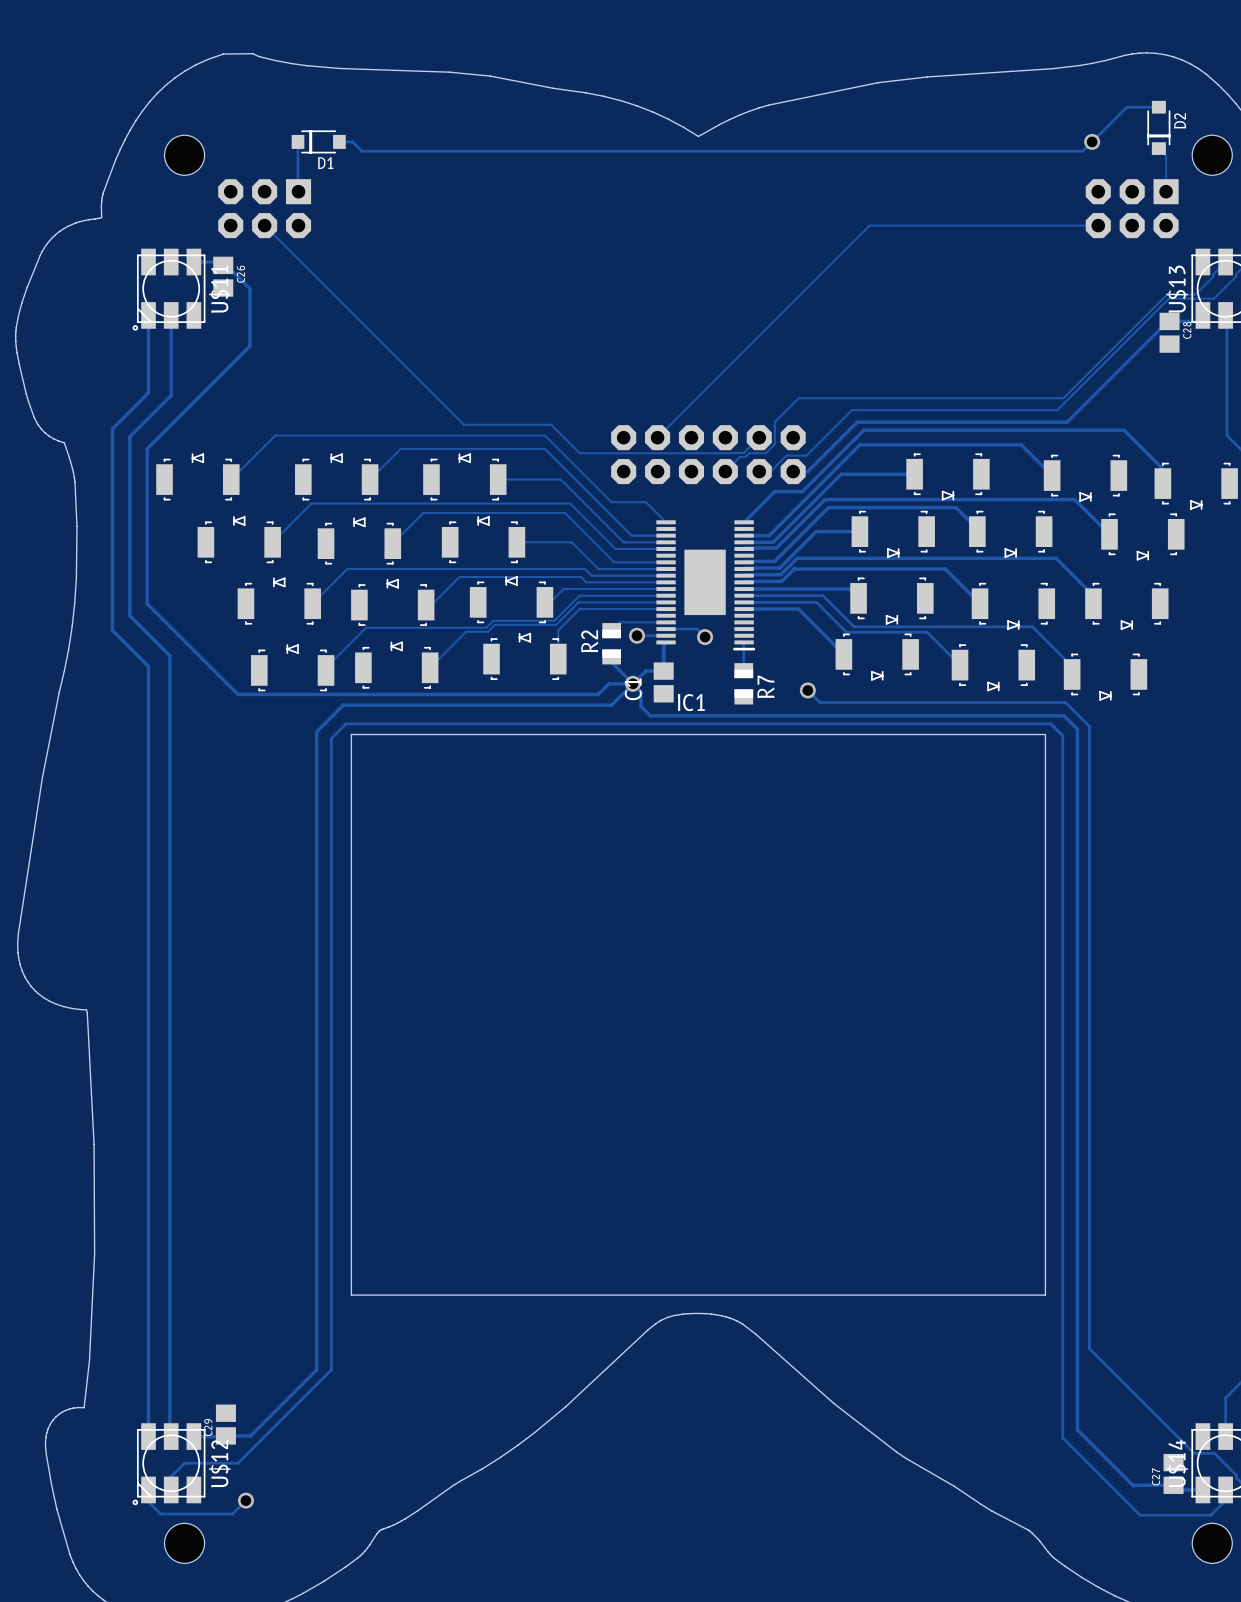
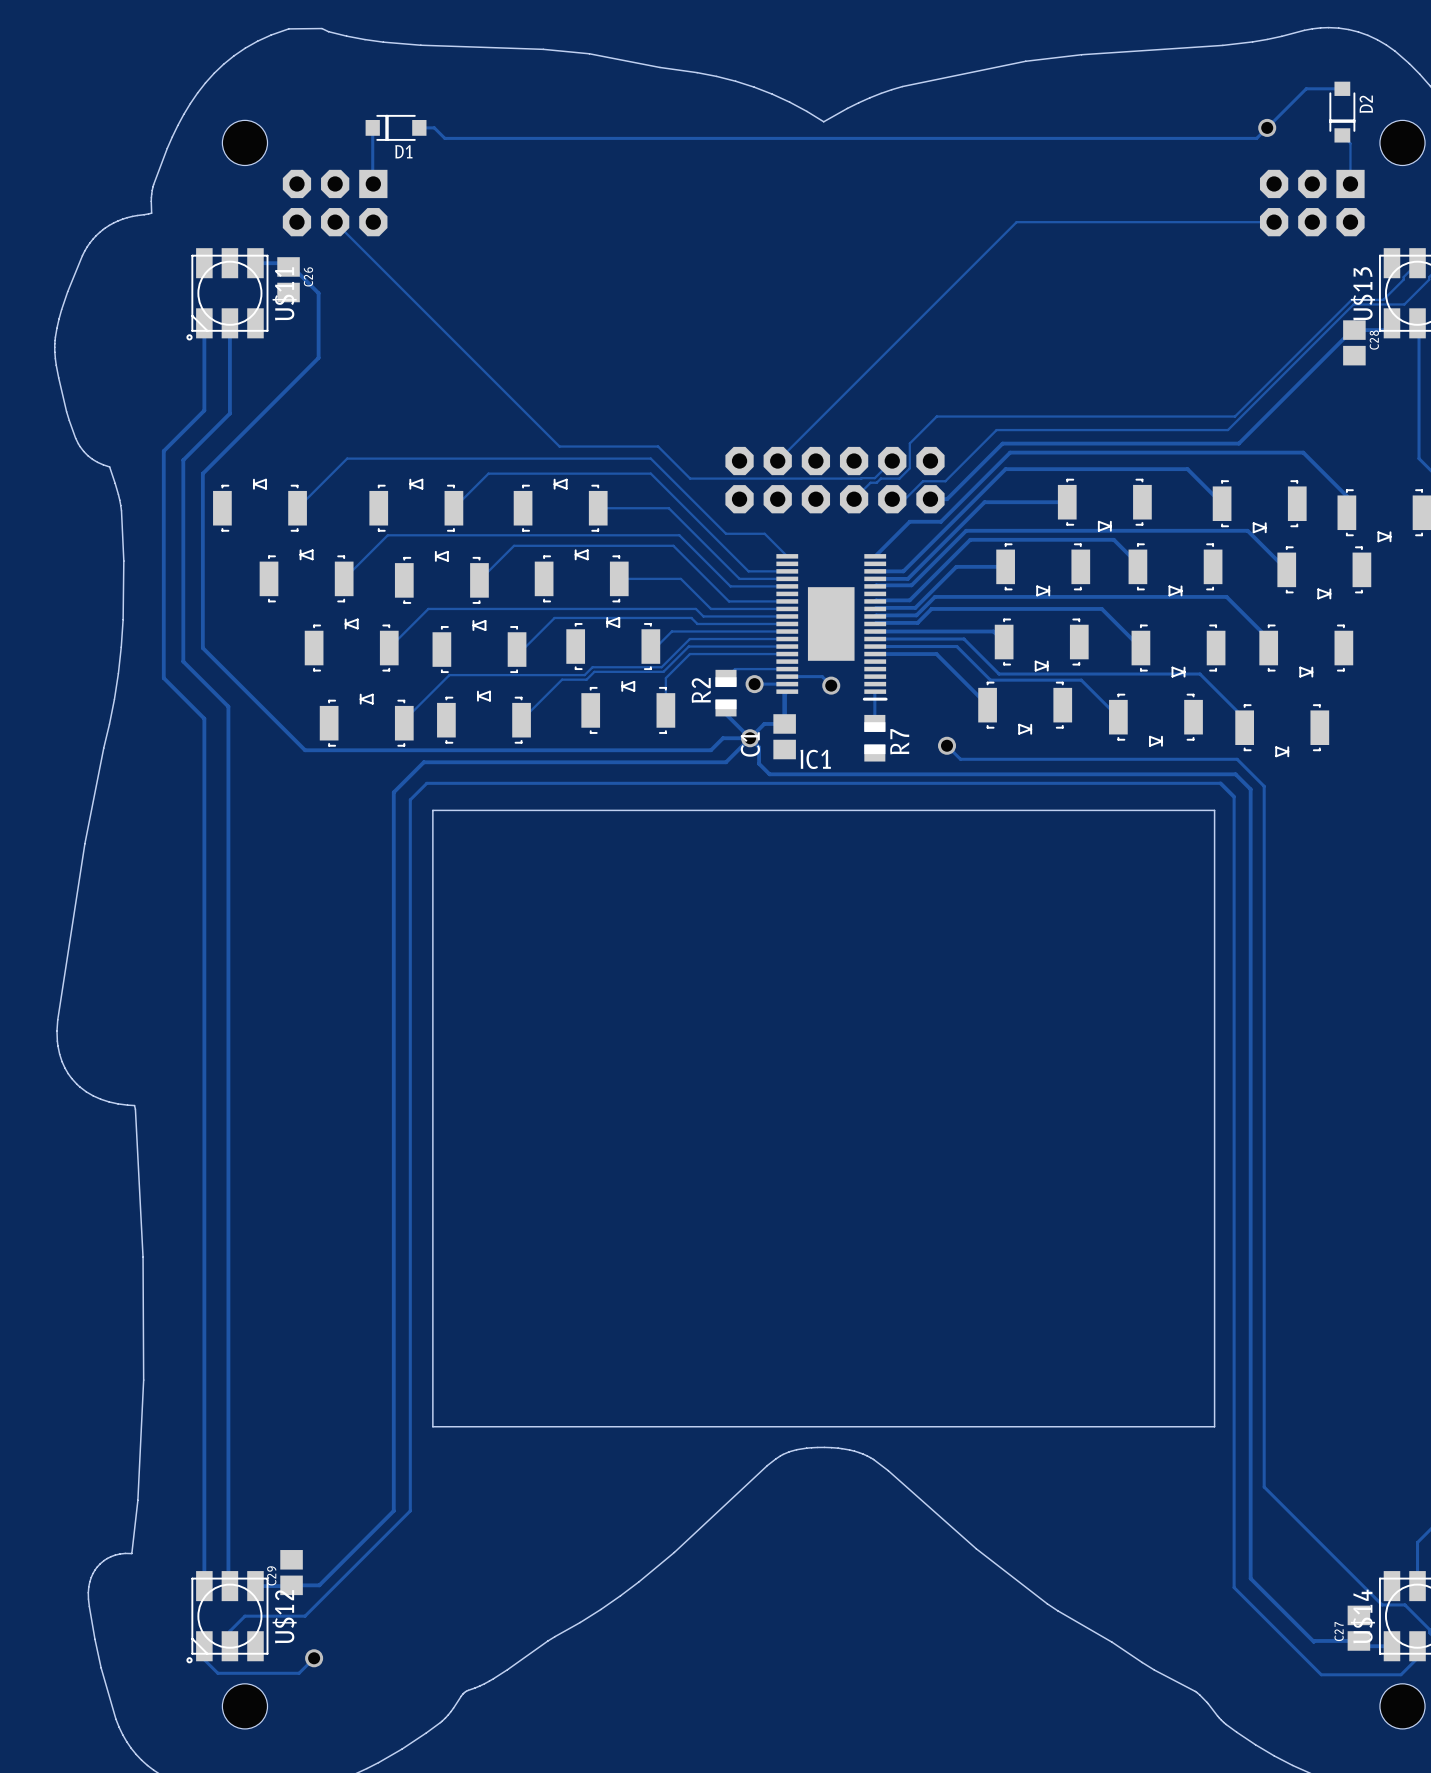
board edge: (1045, 747) (1045, 734) (351, 734) (351, 747) -> (1214, 810) (432, 810)

